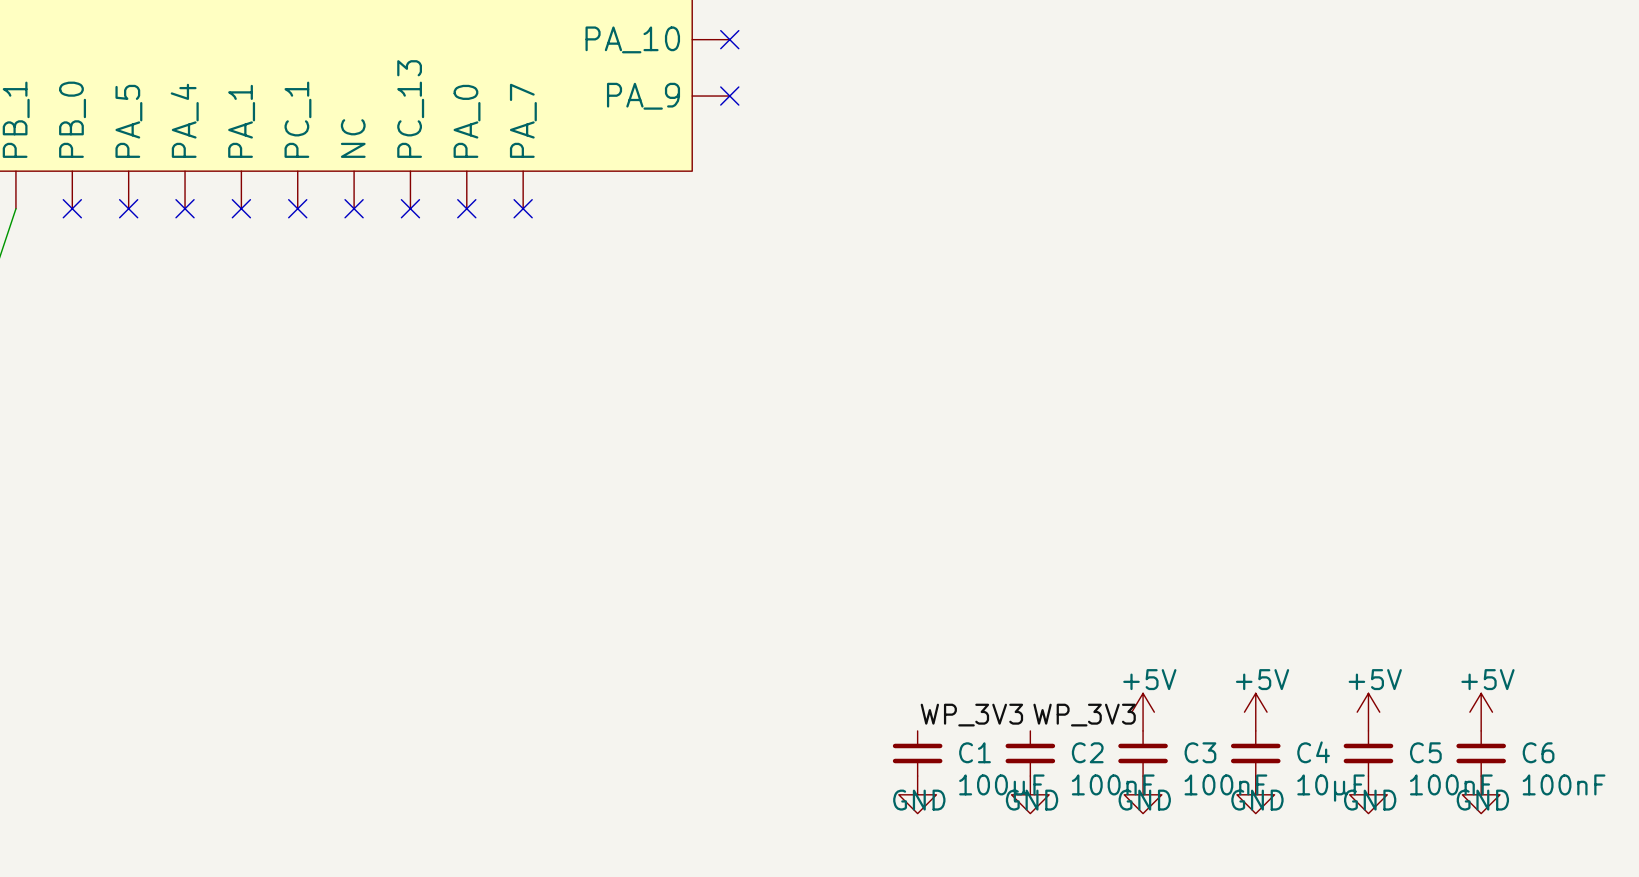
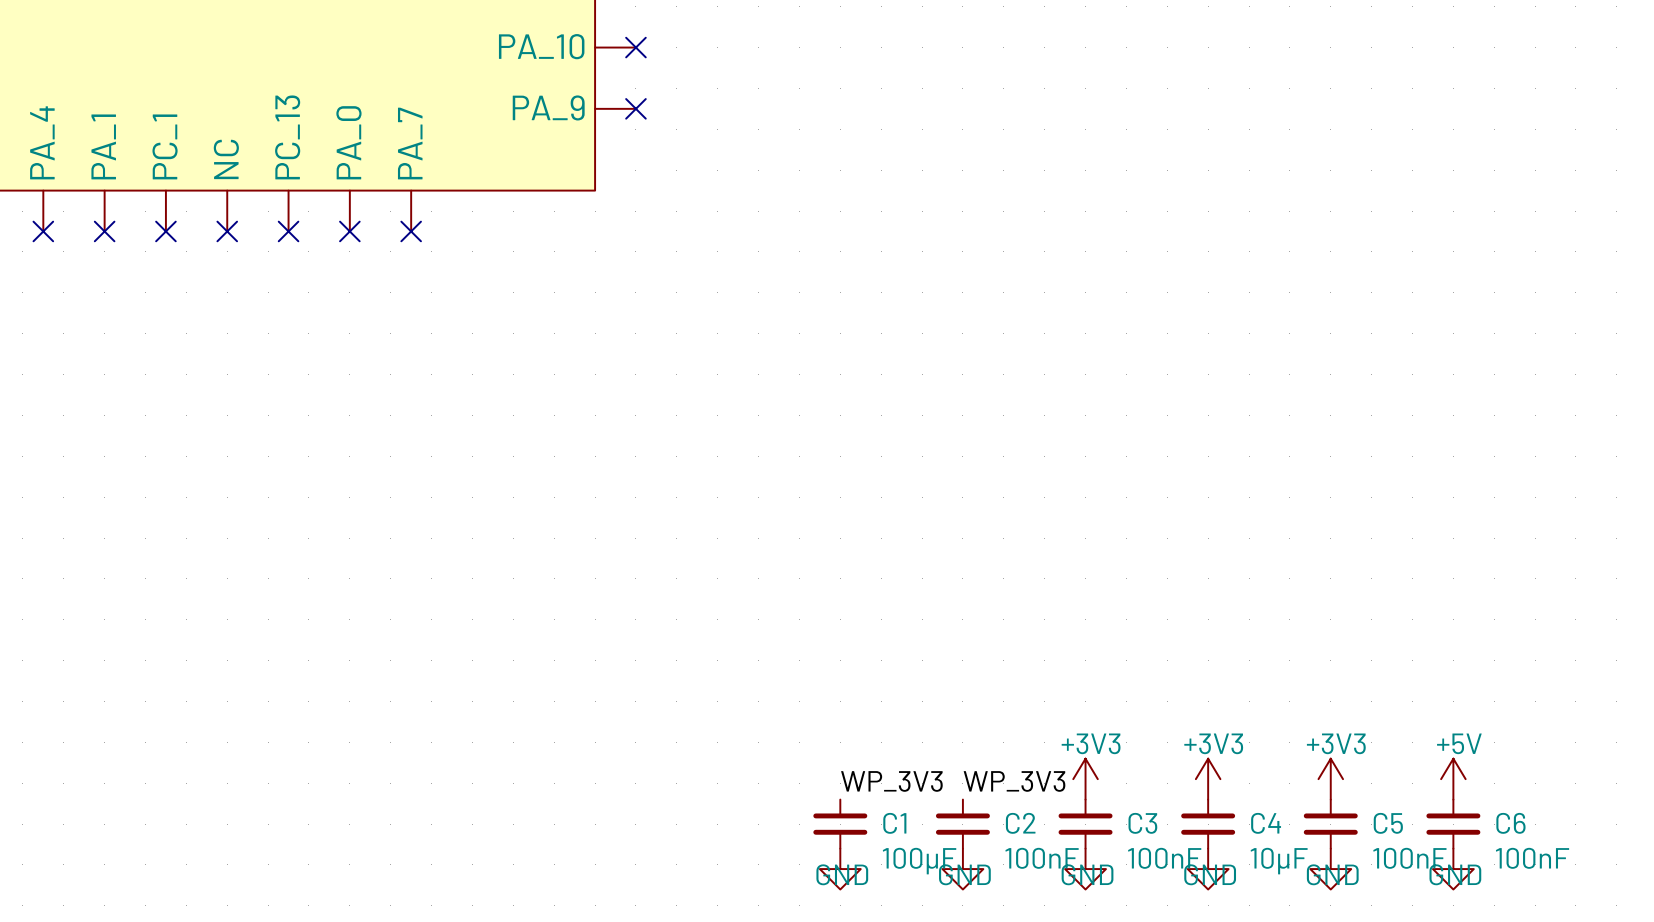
power symbol: +5V (1143, 712) -> +3V3 (1085, 779)
power symbol: +5V (1255, 712) -> +3V3 (1208, 779)
power symbol: +5V (1368, 712) -> +3V3 (1330, 779)

